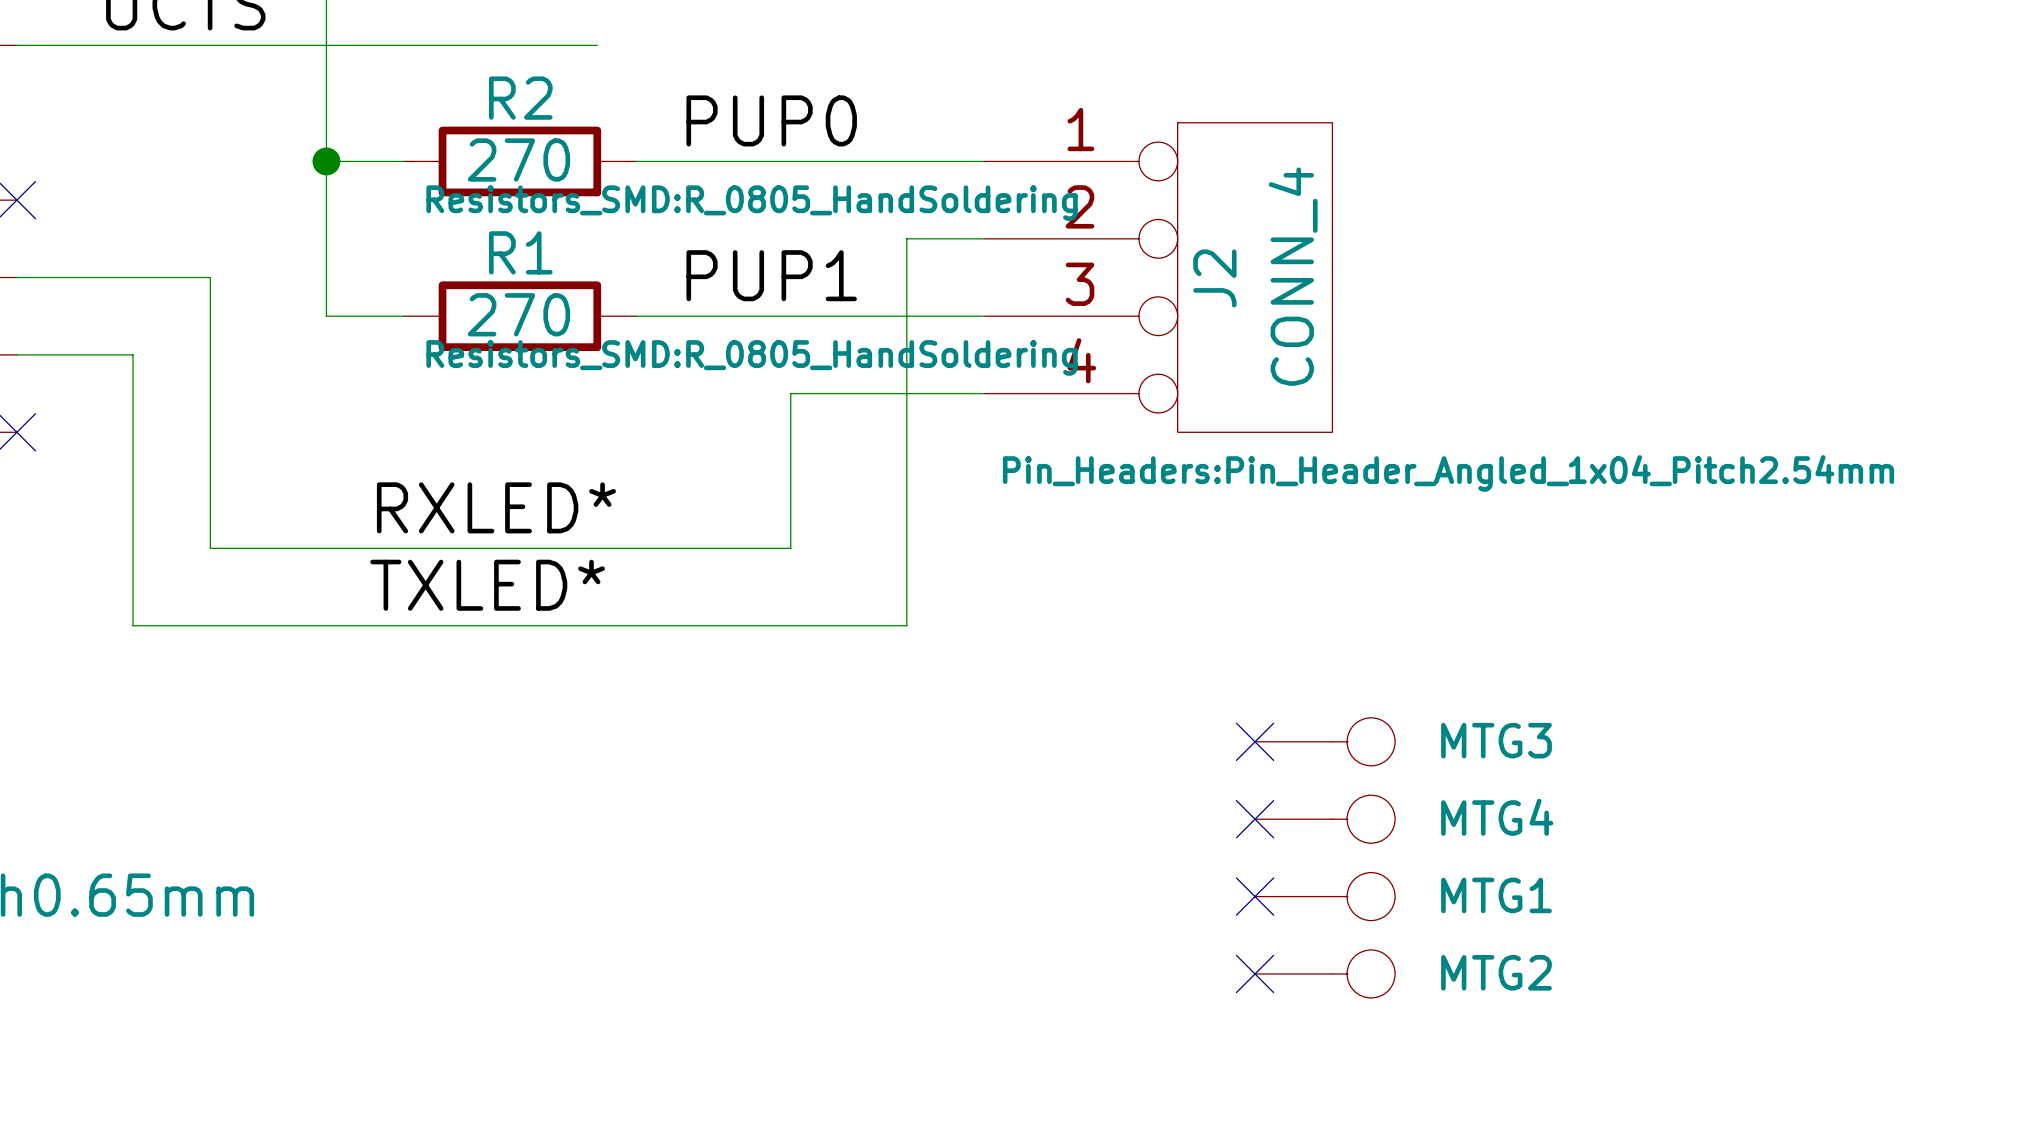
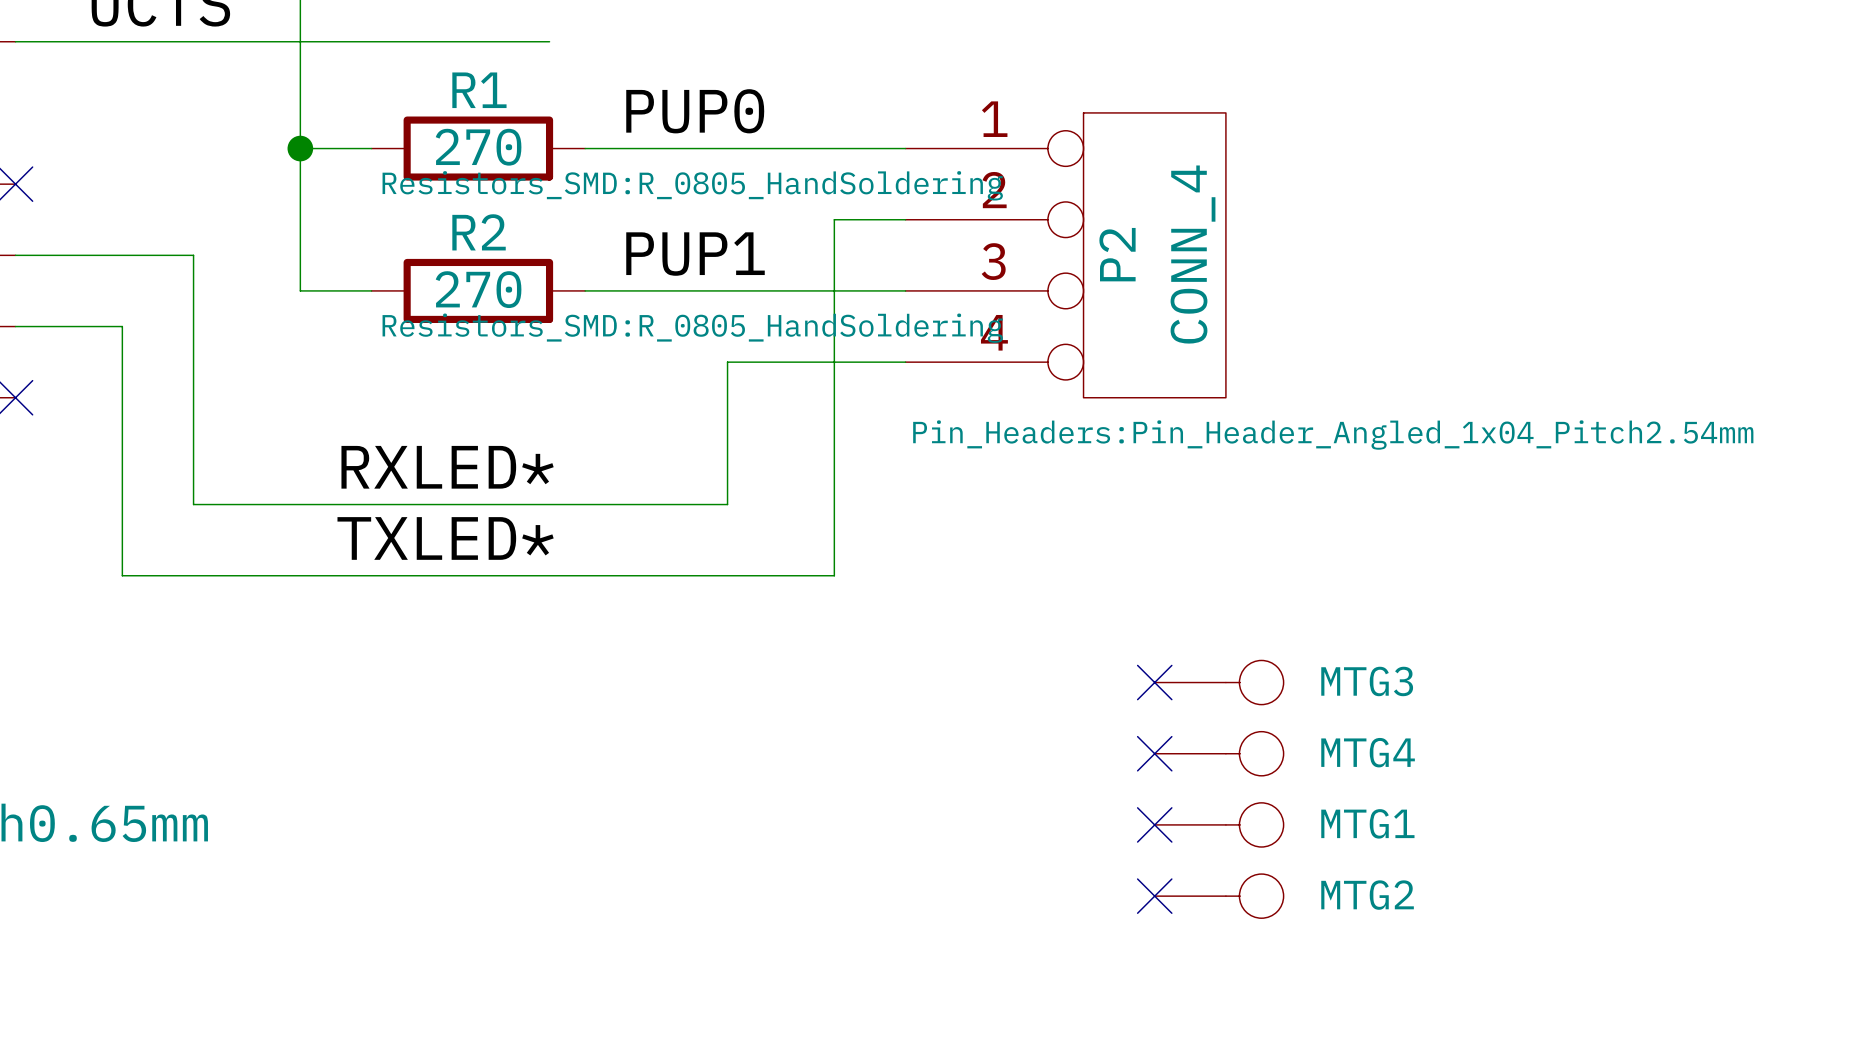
R2 name: R2 (520, 98) -> R1 (479, 90)
R1 name: R1 (520, 252) -> R2 (479, 232)
J2 name: J2 (1214, 278) -> P2 (1117, 254)

